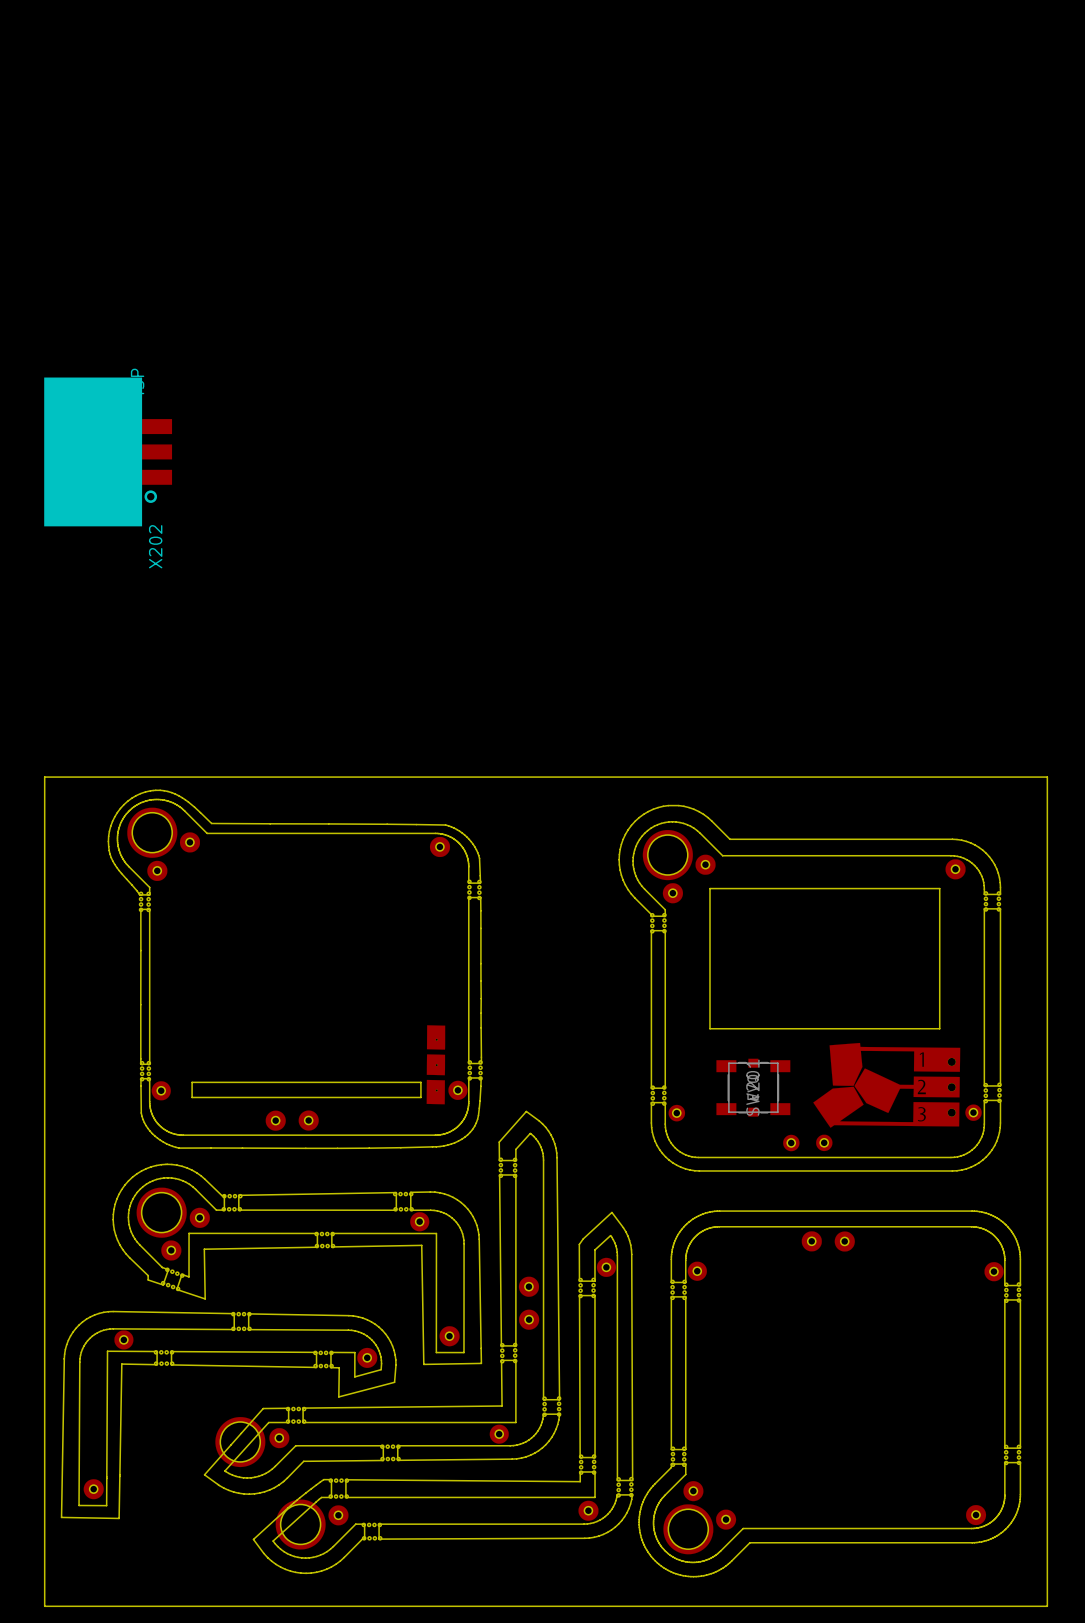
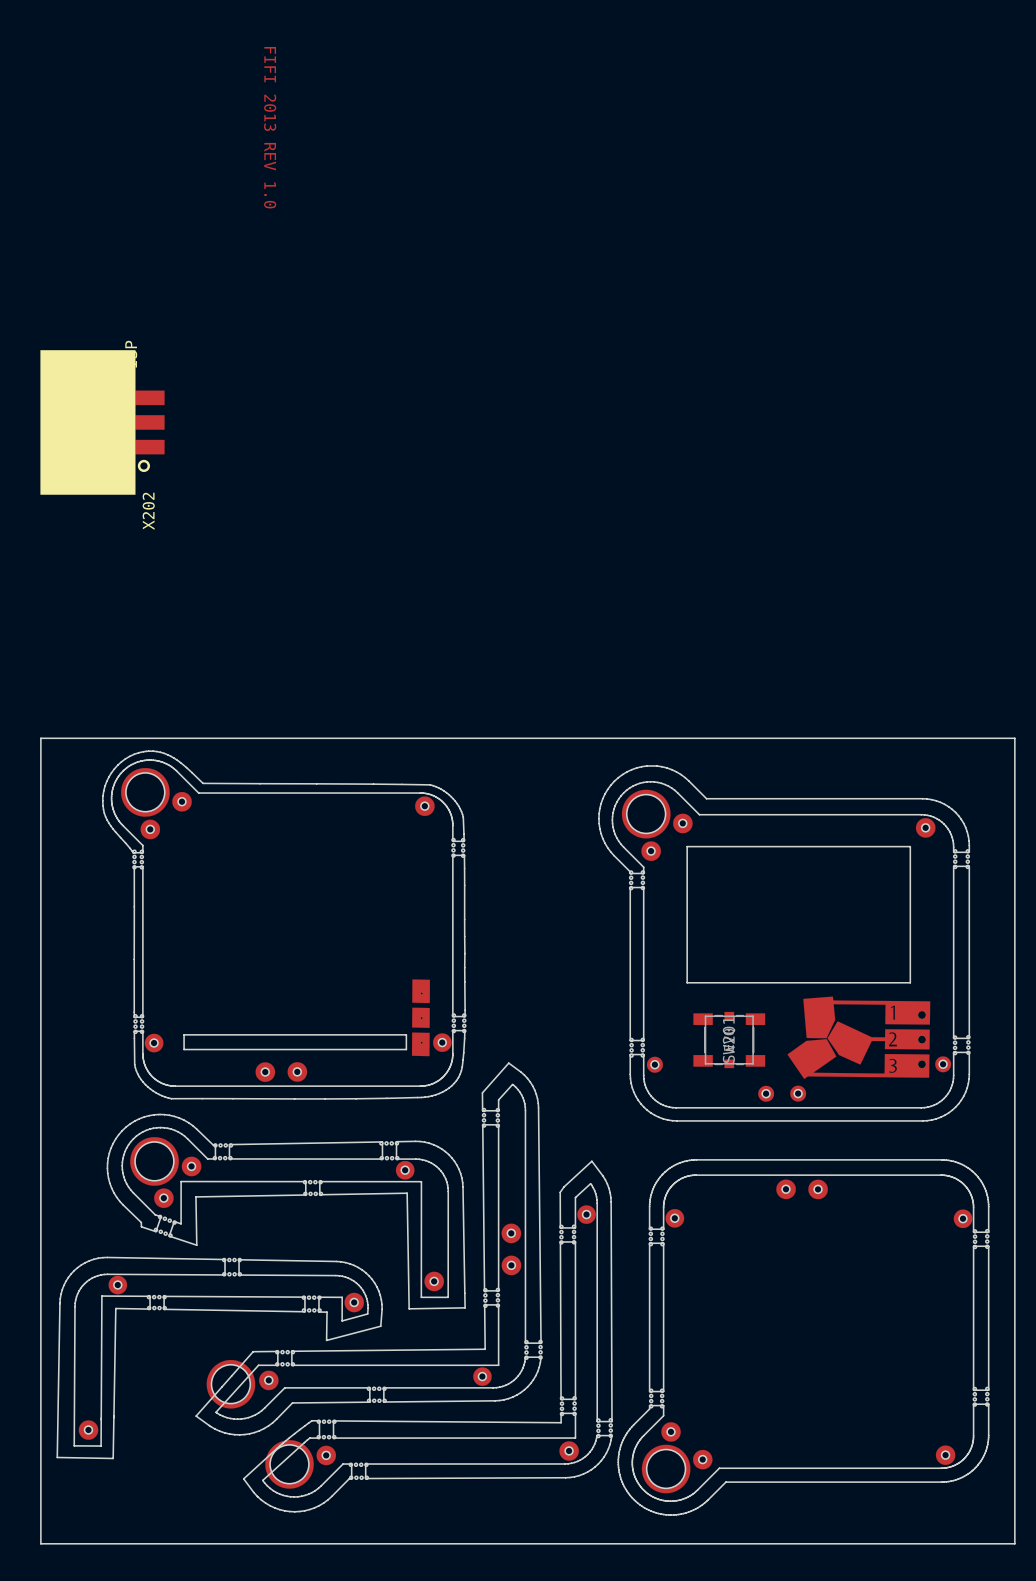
text: none -> FIFI 2013 REV 1.0 (270, 127)

